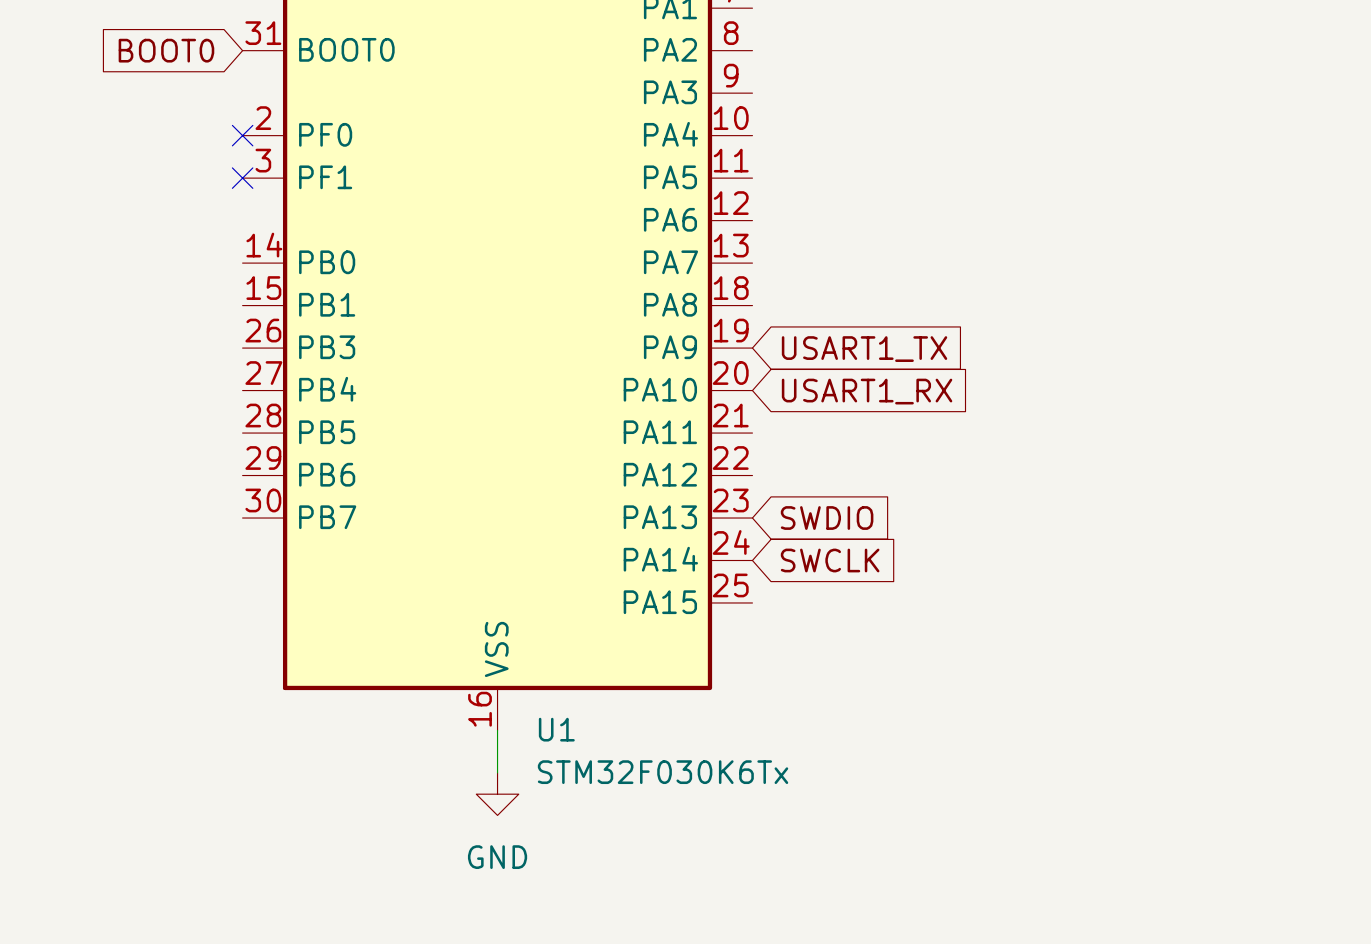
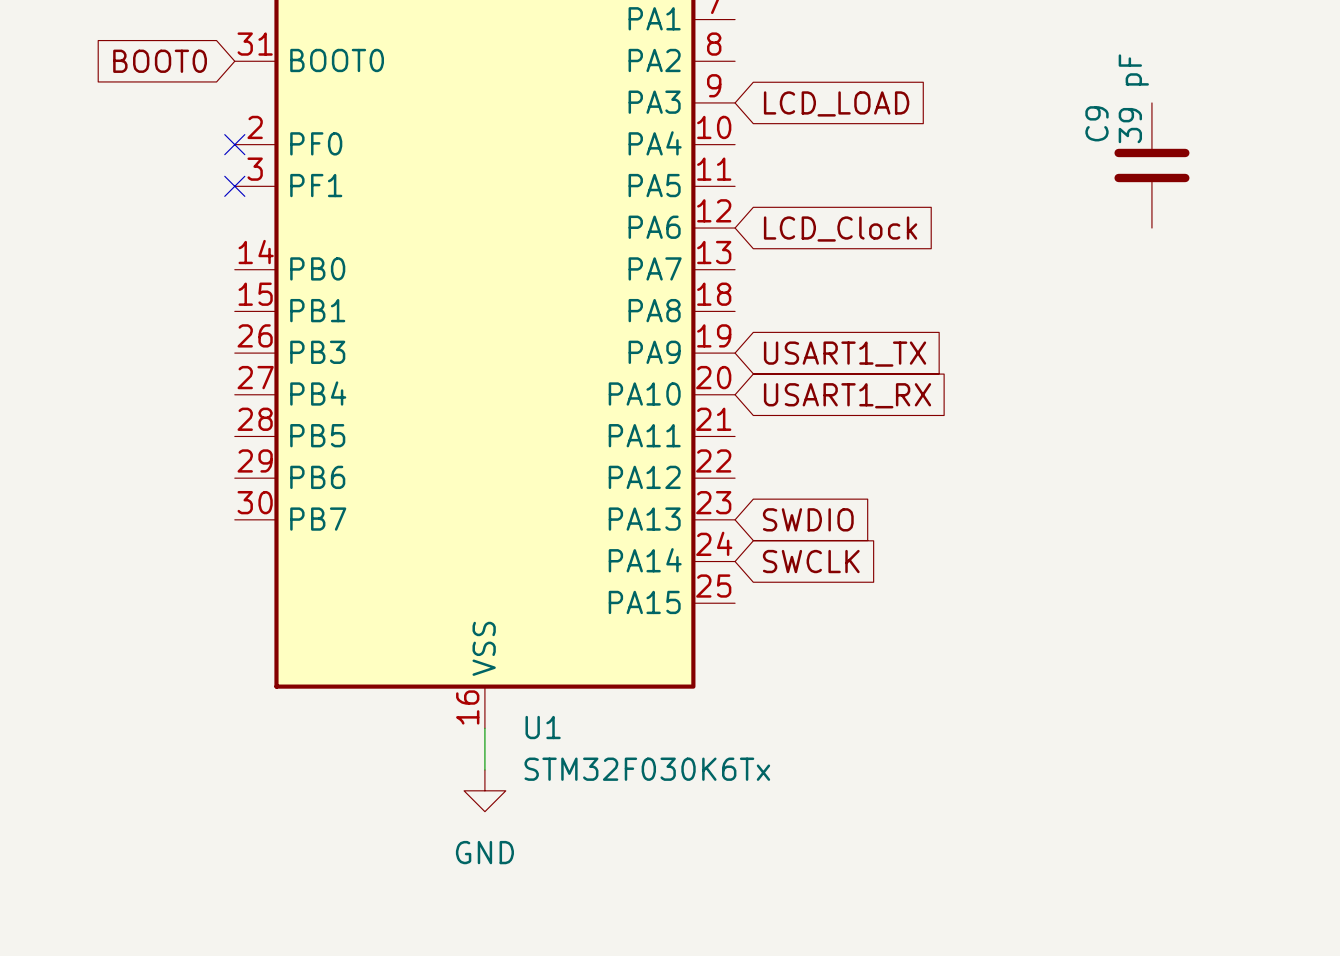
global label: none -> LCD_LOAD (836, 103)
C9: none -> 39 pF (1151, 165)
global label: none -> LCD_Clock (840, 229)

